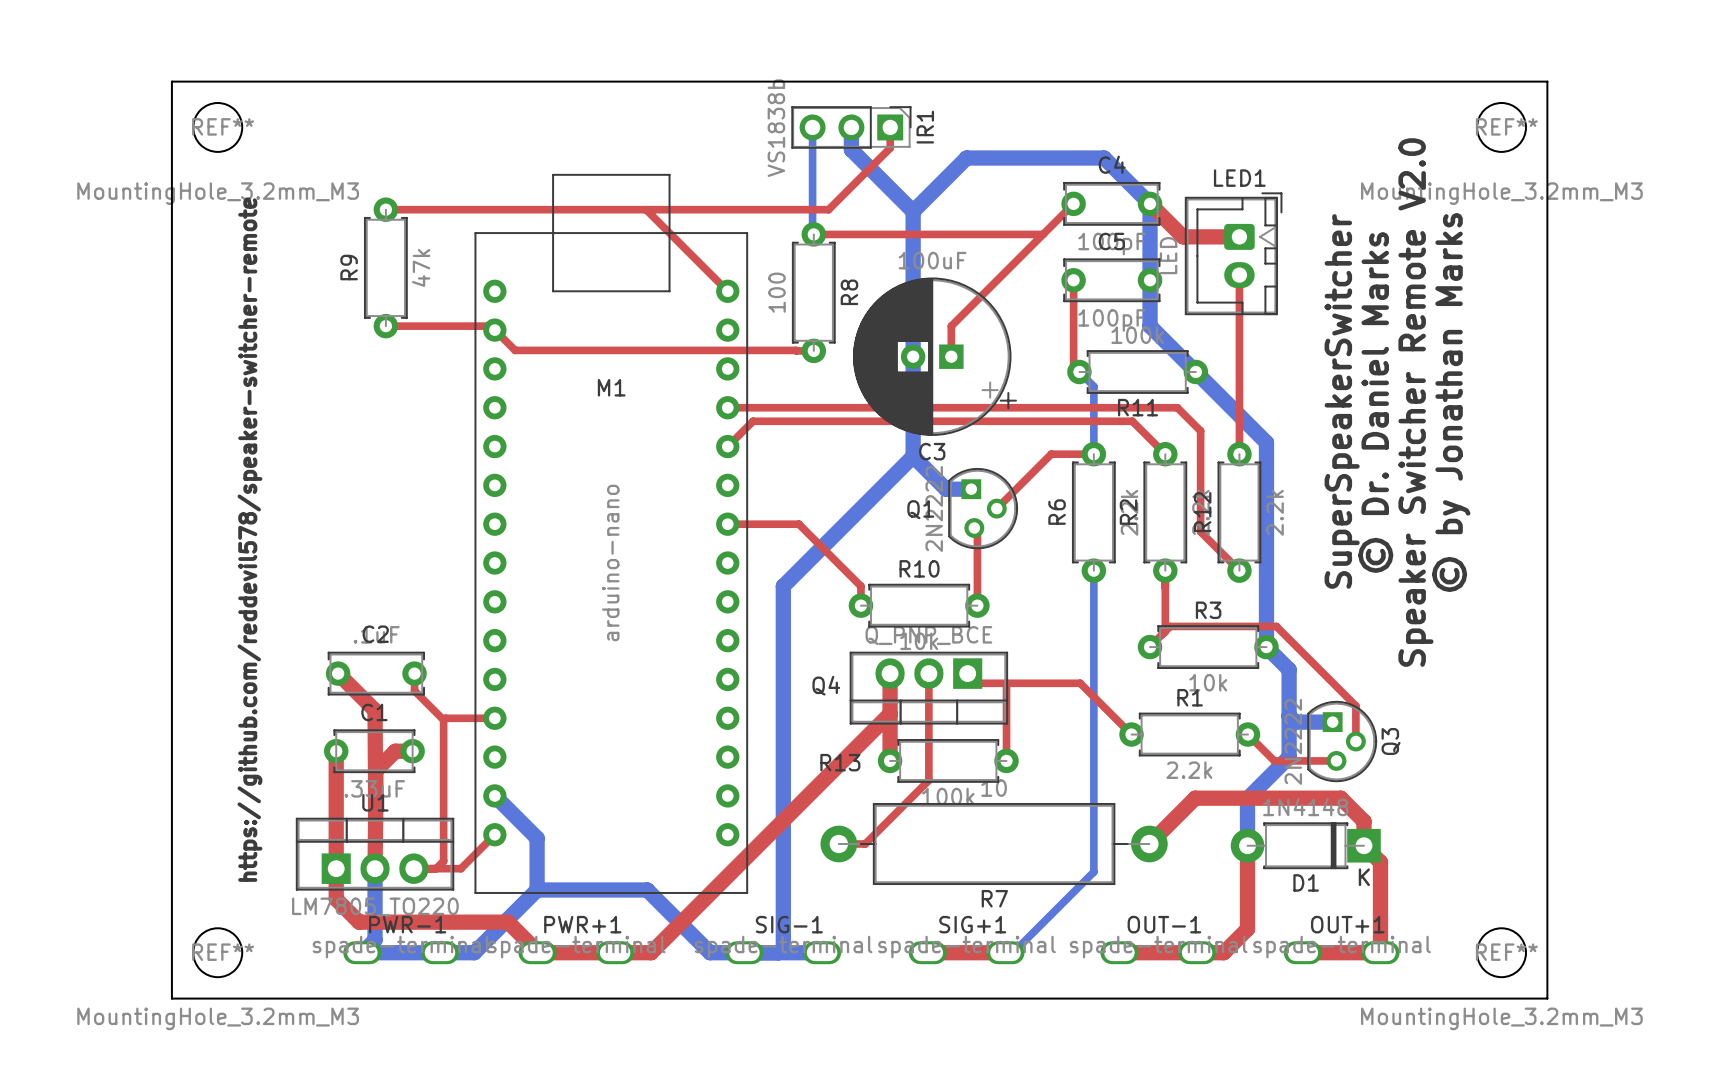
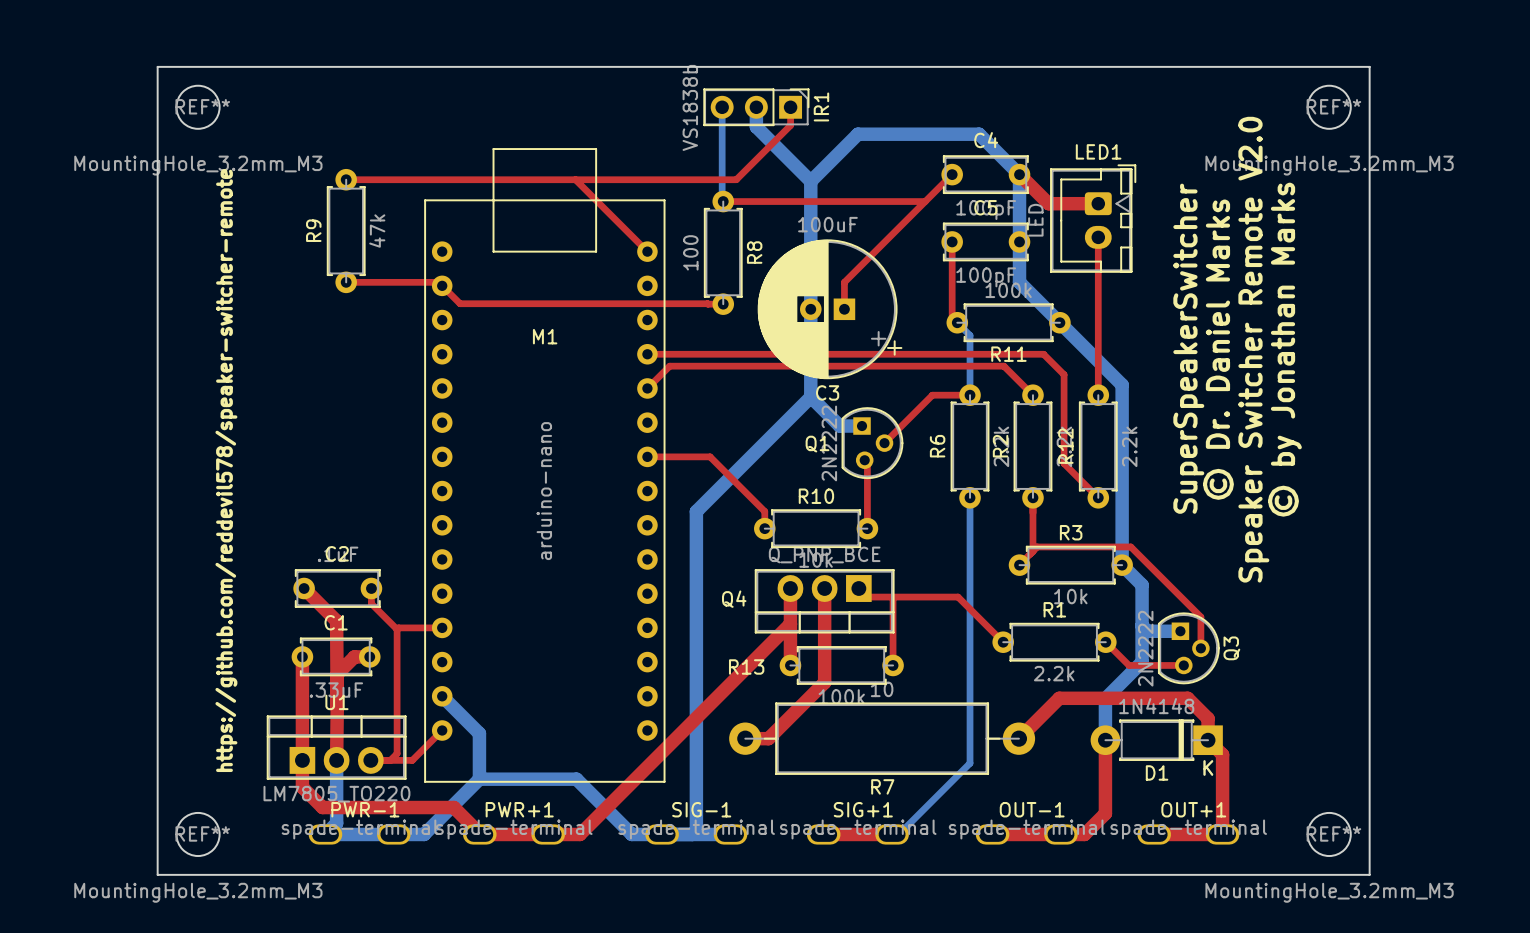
top track width: thin (928, 683) (928, 780) (865, 844) (838, 844) -> thick (824, 597) (824, 682) (768, 738) (745, 738)

